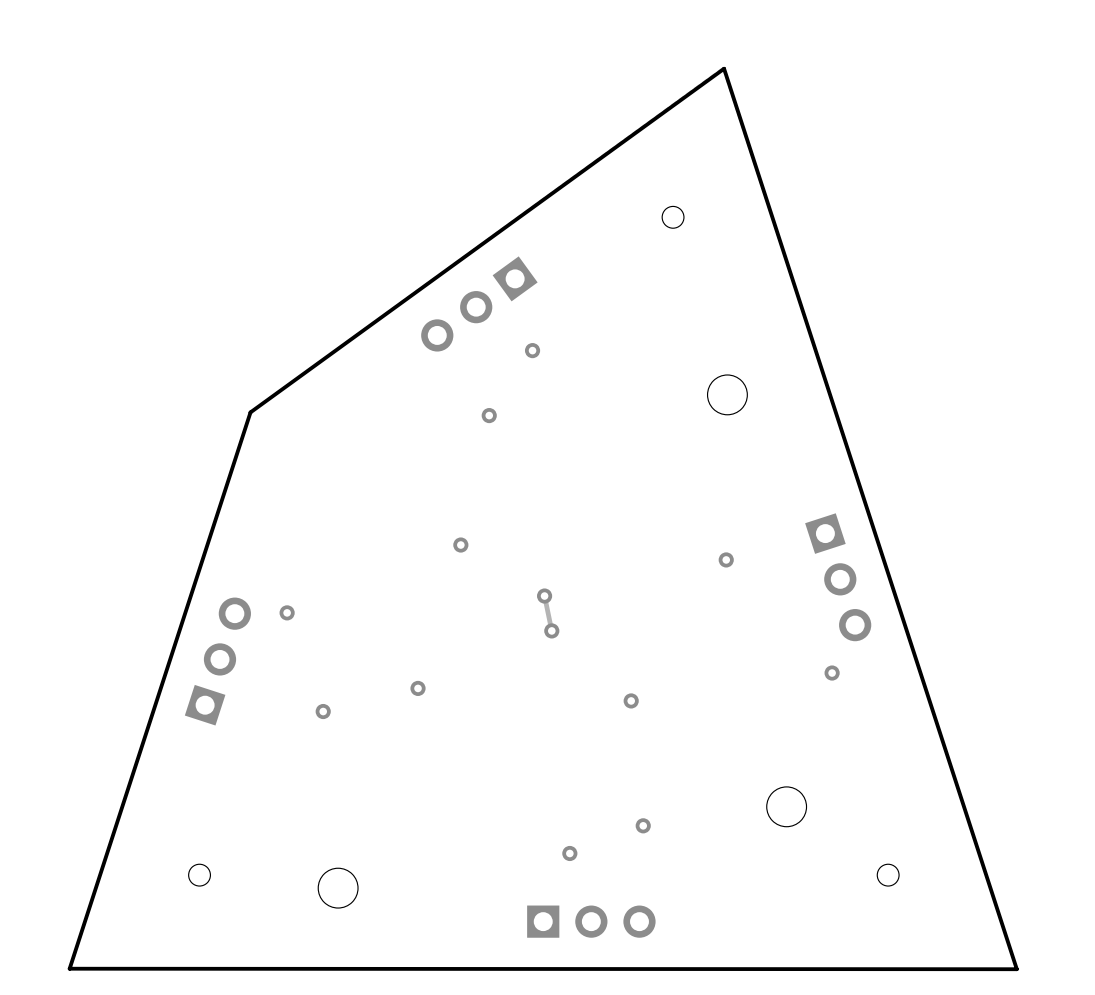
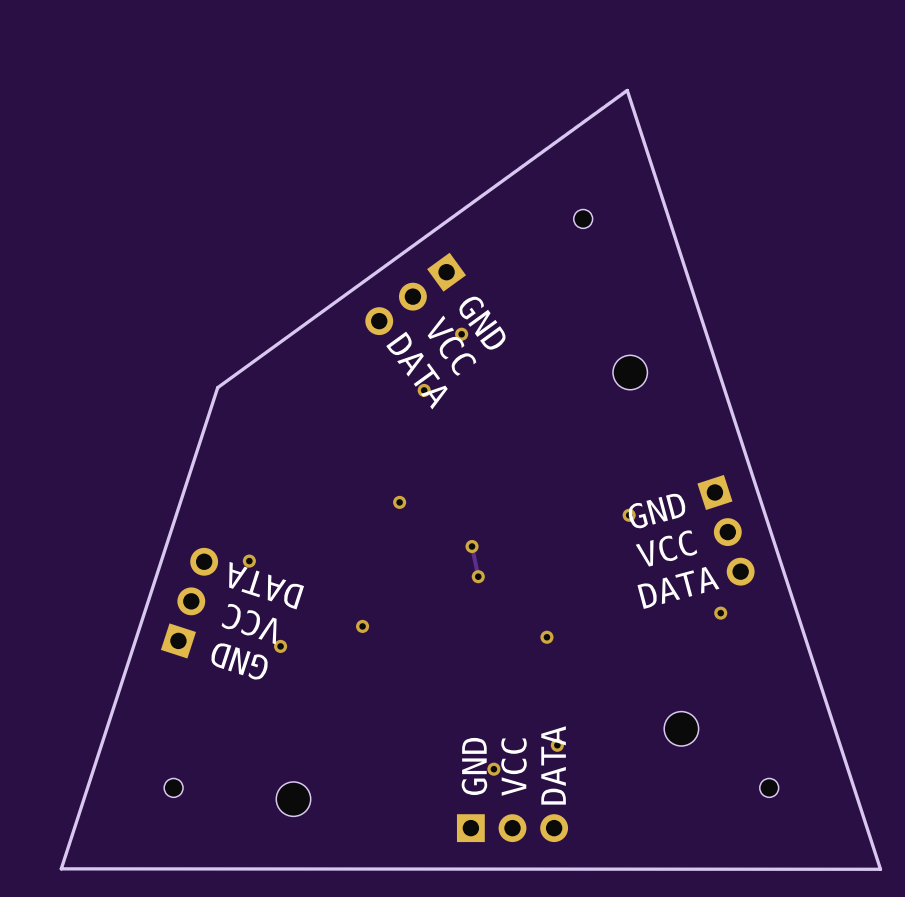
text: none -> GND (482, 323)
text: none -> VCC (451, 345)
text: none -> DATA (416, 370)
text: none -> GND (657, 511)
text: none -> VCC (666, 548)
text: none -> DATA (266, 585)
text: none -> DATA (678, 587)
text: none -> VCC (249, 624)
text: none -> GND (239, 661)
text: none -> DATA (553, 765)
text: none -> GND (474, 766)
text: none -> VCC (514, 767)

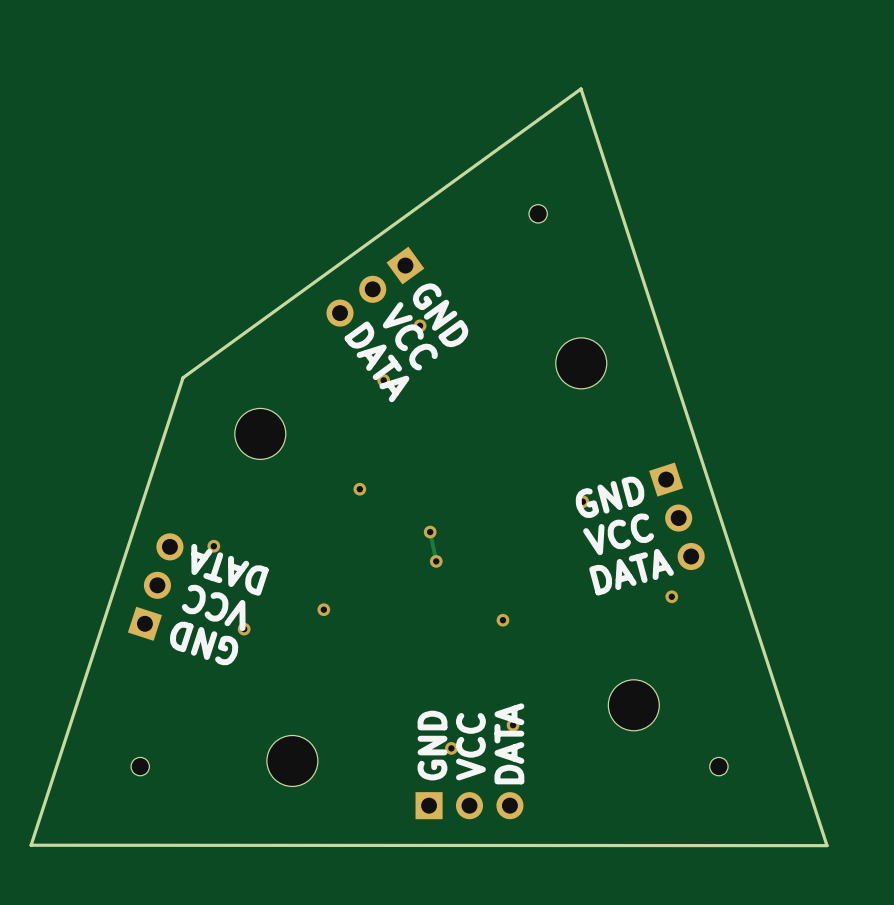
part footprint: [613, 355, 648, 390] -> [555, 337, 607, 389]
part: none -> (260, 433)
part footprint: [664, 711, 699, 747] -> [608, 679, 660, 731]
part: none -> (292, 760)
part: (293, 799) -> none

